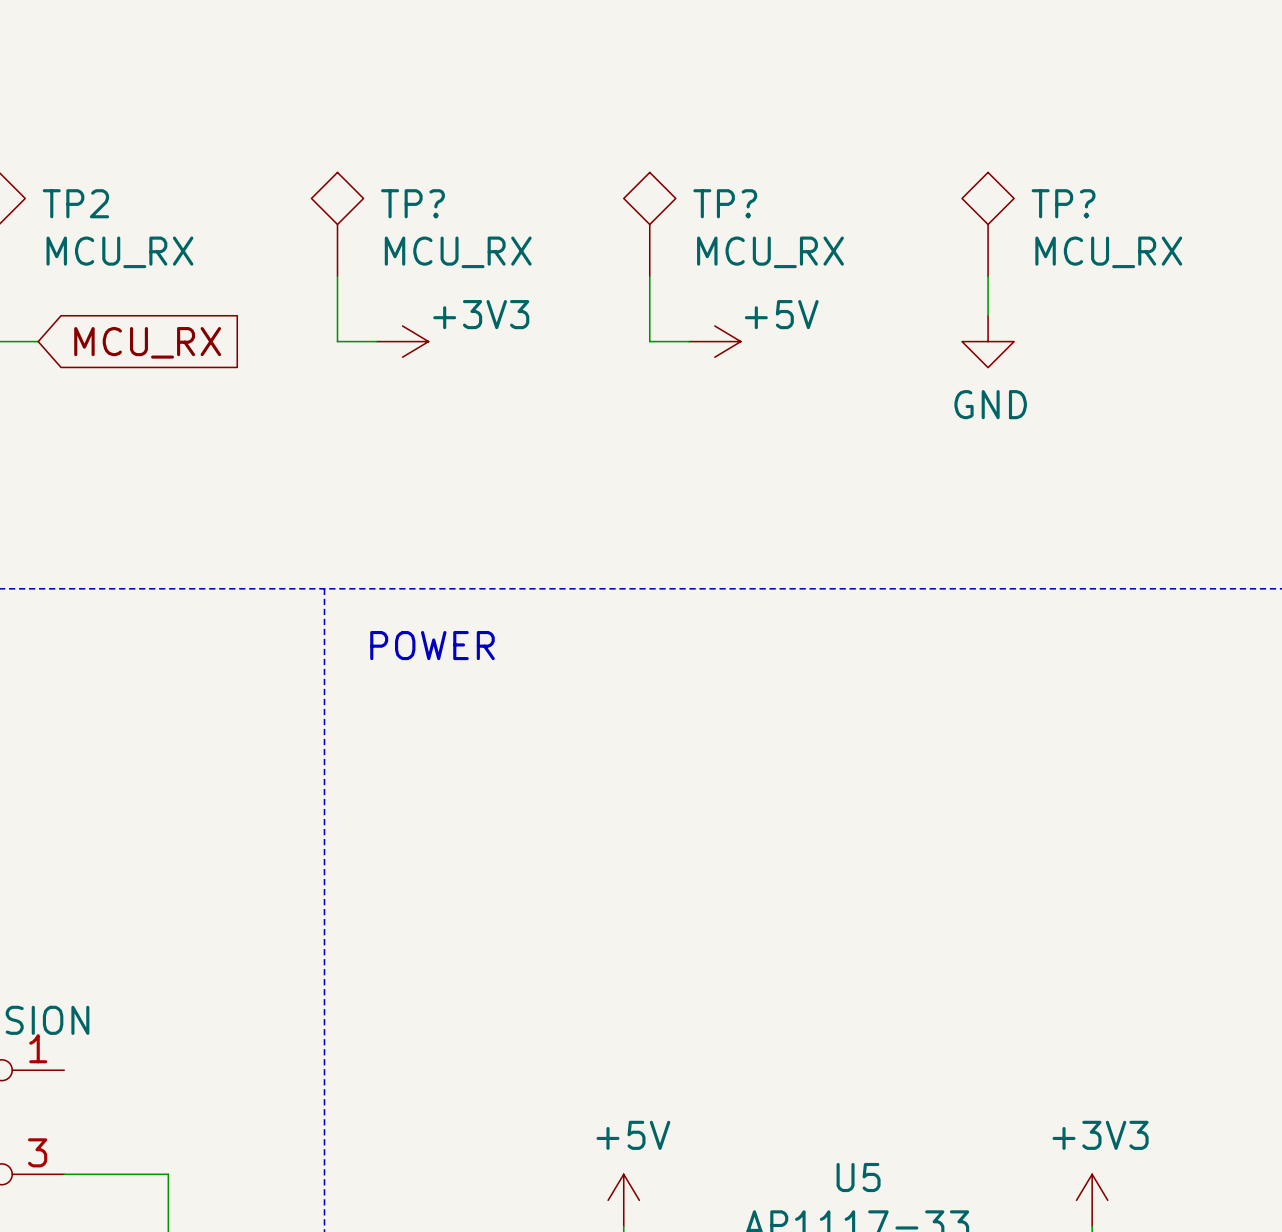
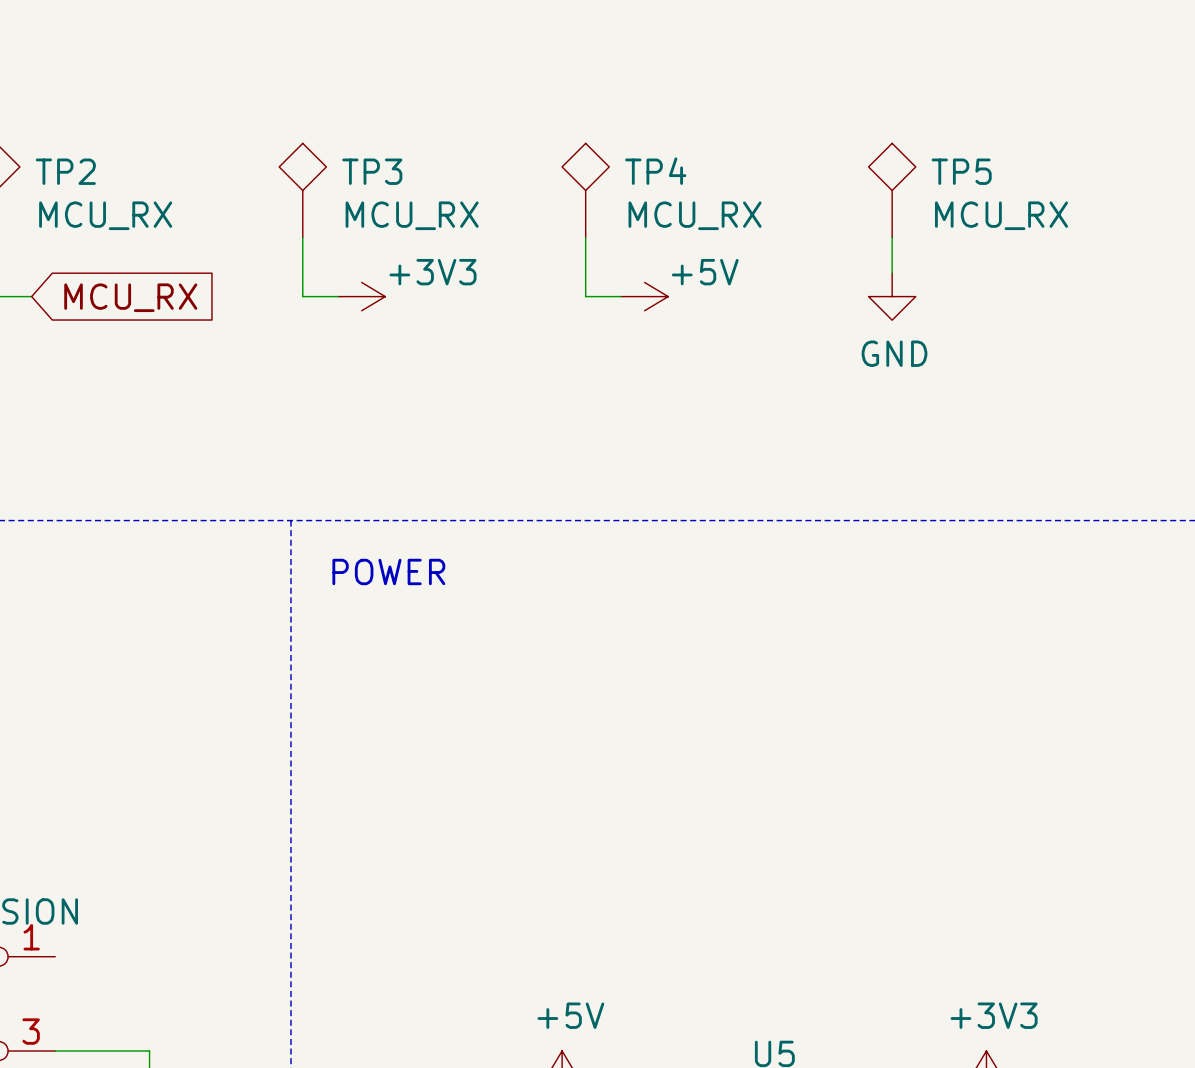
TP? name: TP? (412, 203) -> TP3 (372, 171)
TP? name: TP? (725, 203) -> TP4 (655, 171)
TP? name: TP? (1063, 203) -> TP5 (961, 171)

